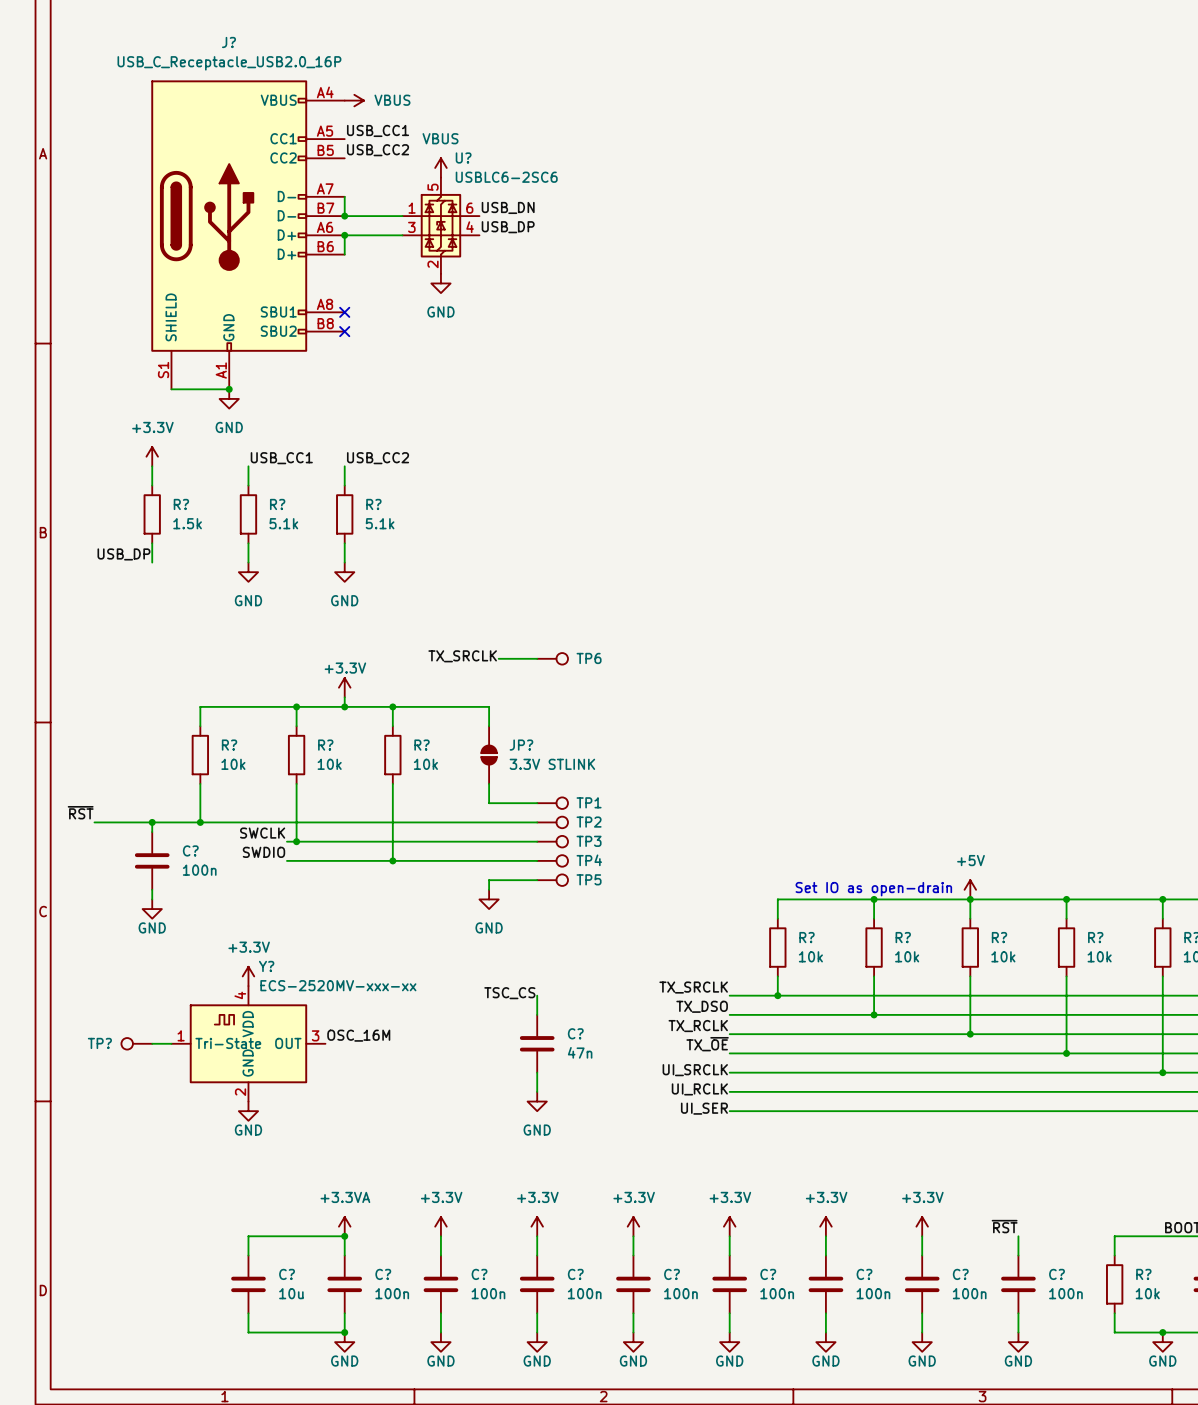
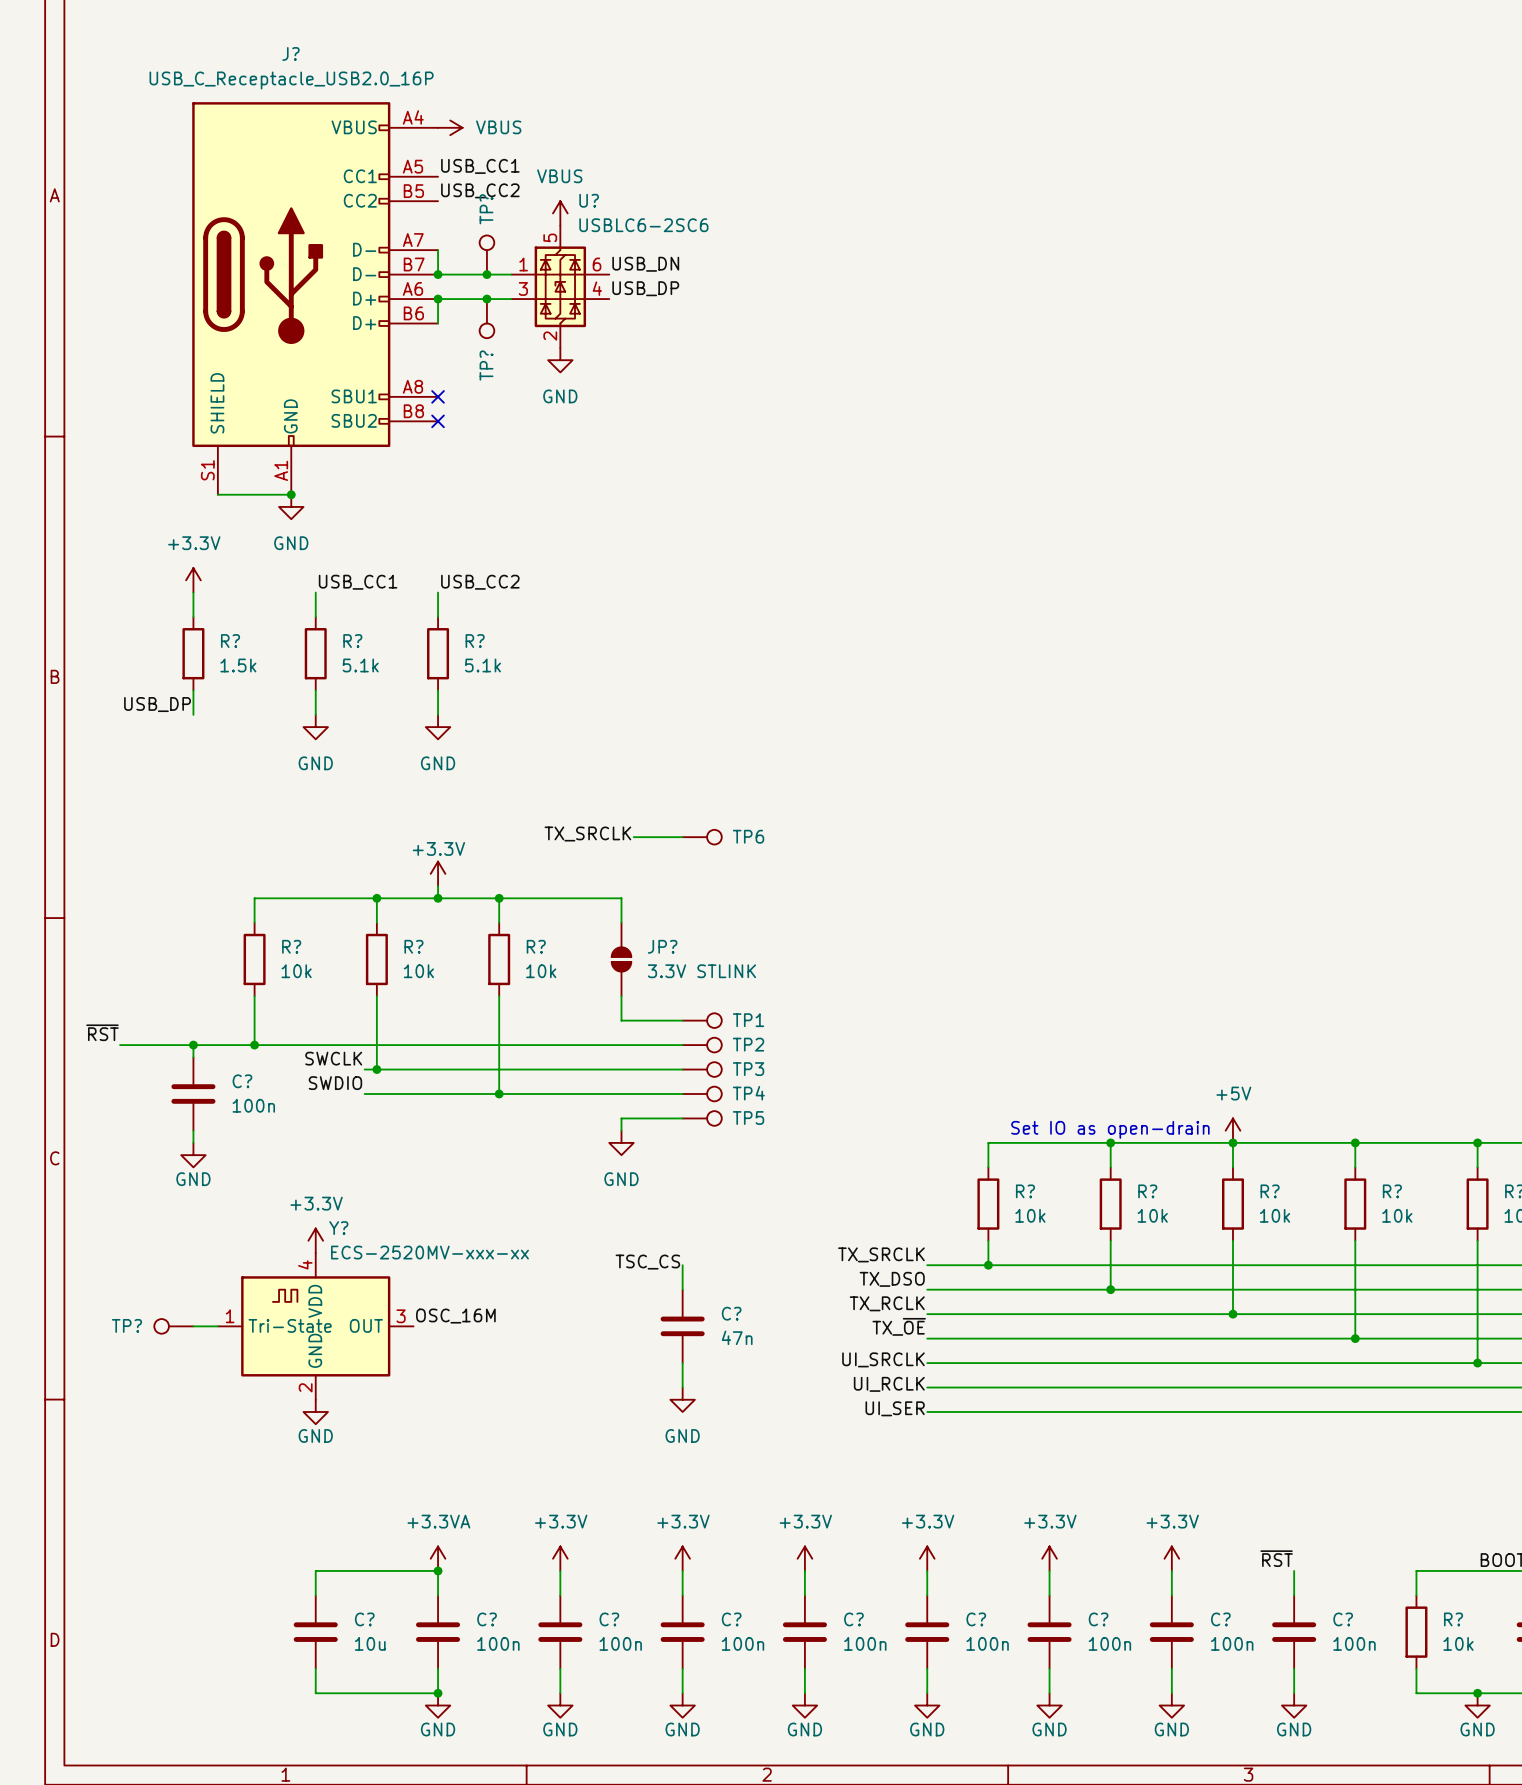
TP?: none -> (486, 255)
junction: none -> (486, 274)
junction: none -> (486, 299)
TP?: none -> (486, 318)

